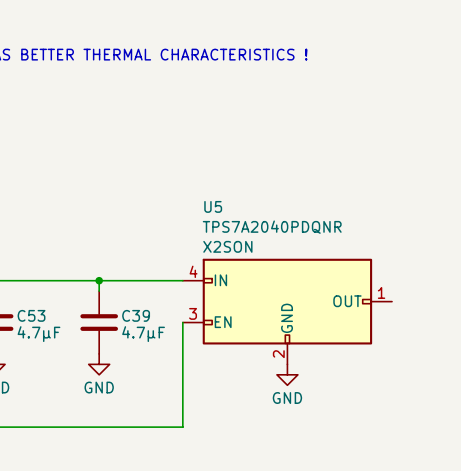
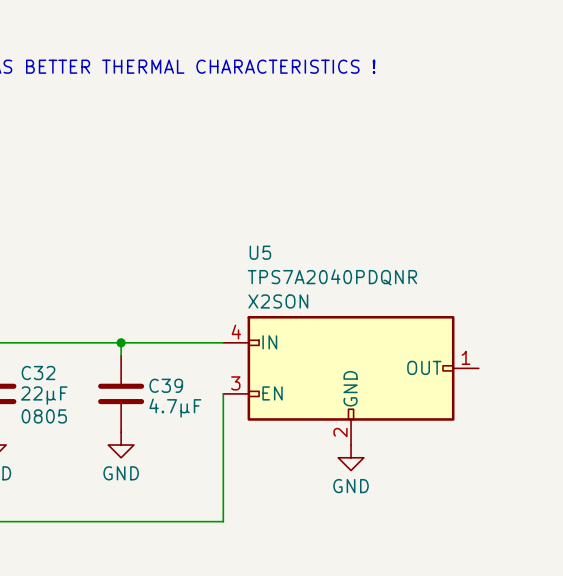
C53 name: C53 (31, 315) -> C32 (38, 373)
C53 value: 4.7μF (39, 334) -> 22μF (44, 395)
C53 text: none -> 0805 (44, 416)

